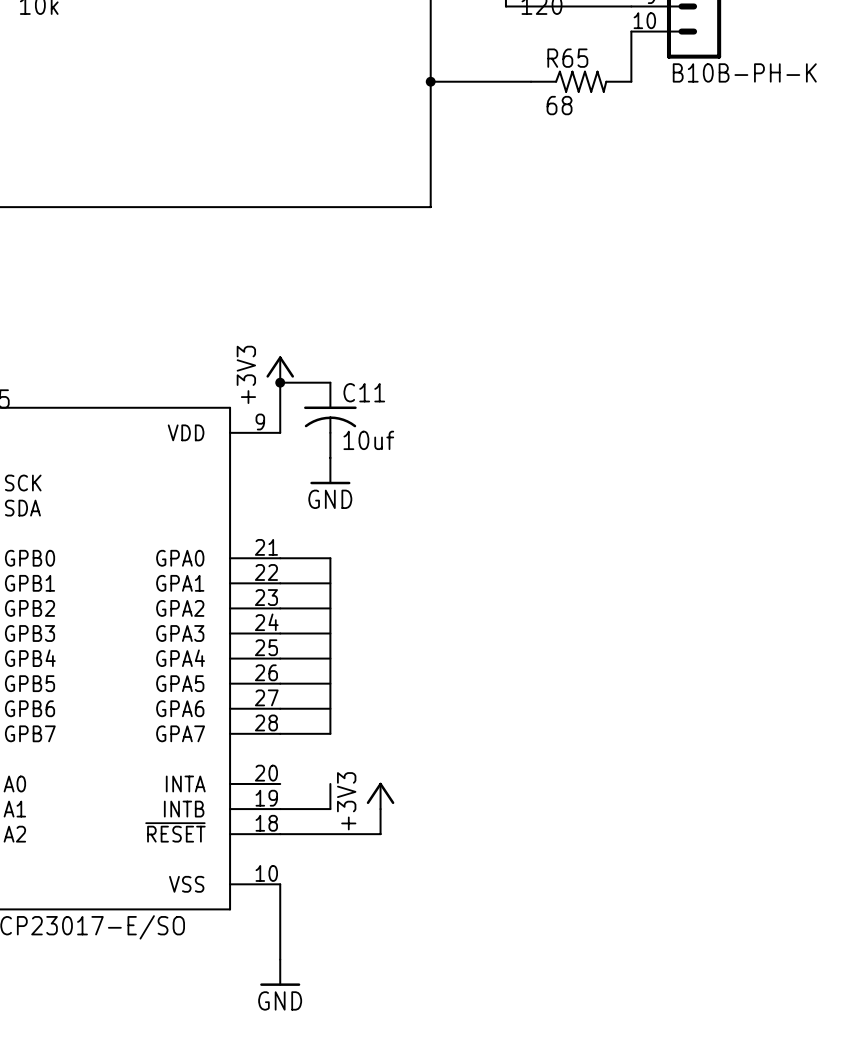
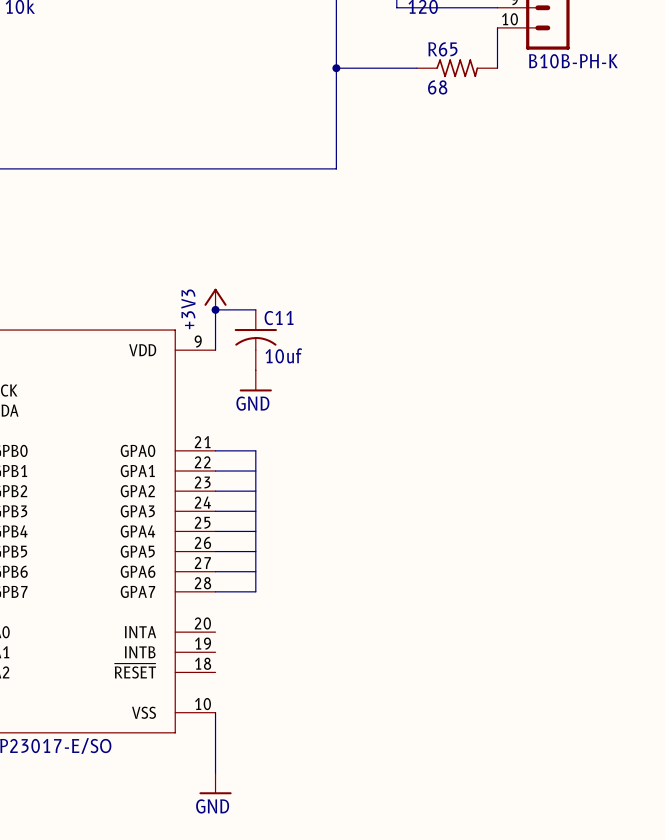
bus: (330, 783) (330, 809) -> none
power symbol: +3V3 (380, 795) -> none
wire: (280, 809) (330, 809) -> none
wire: (380, 809) (380, 834) (280, 834) -> none

